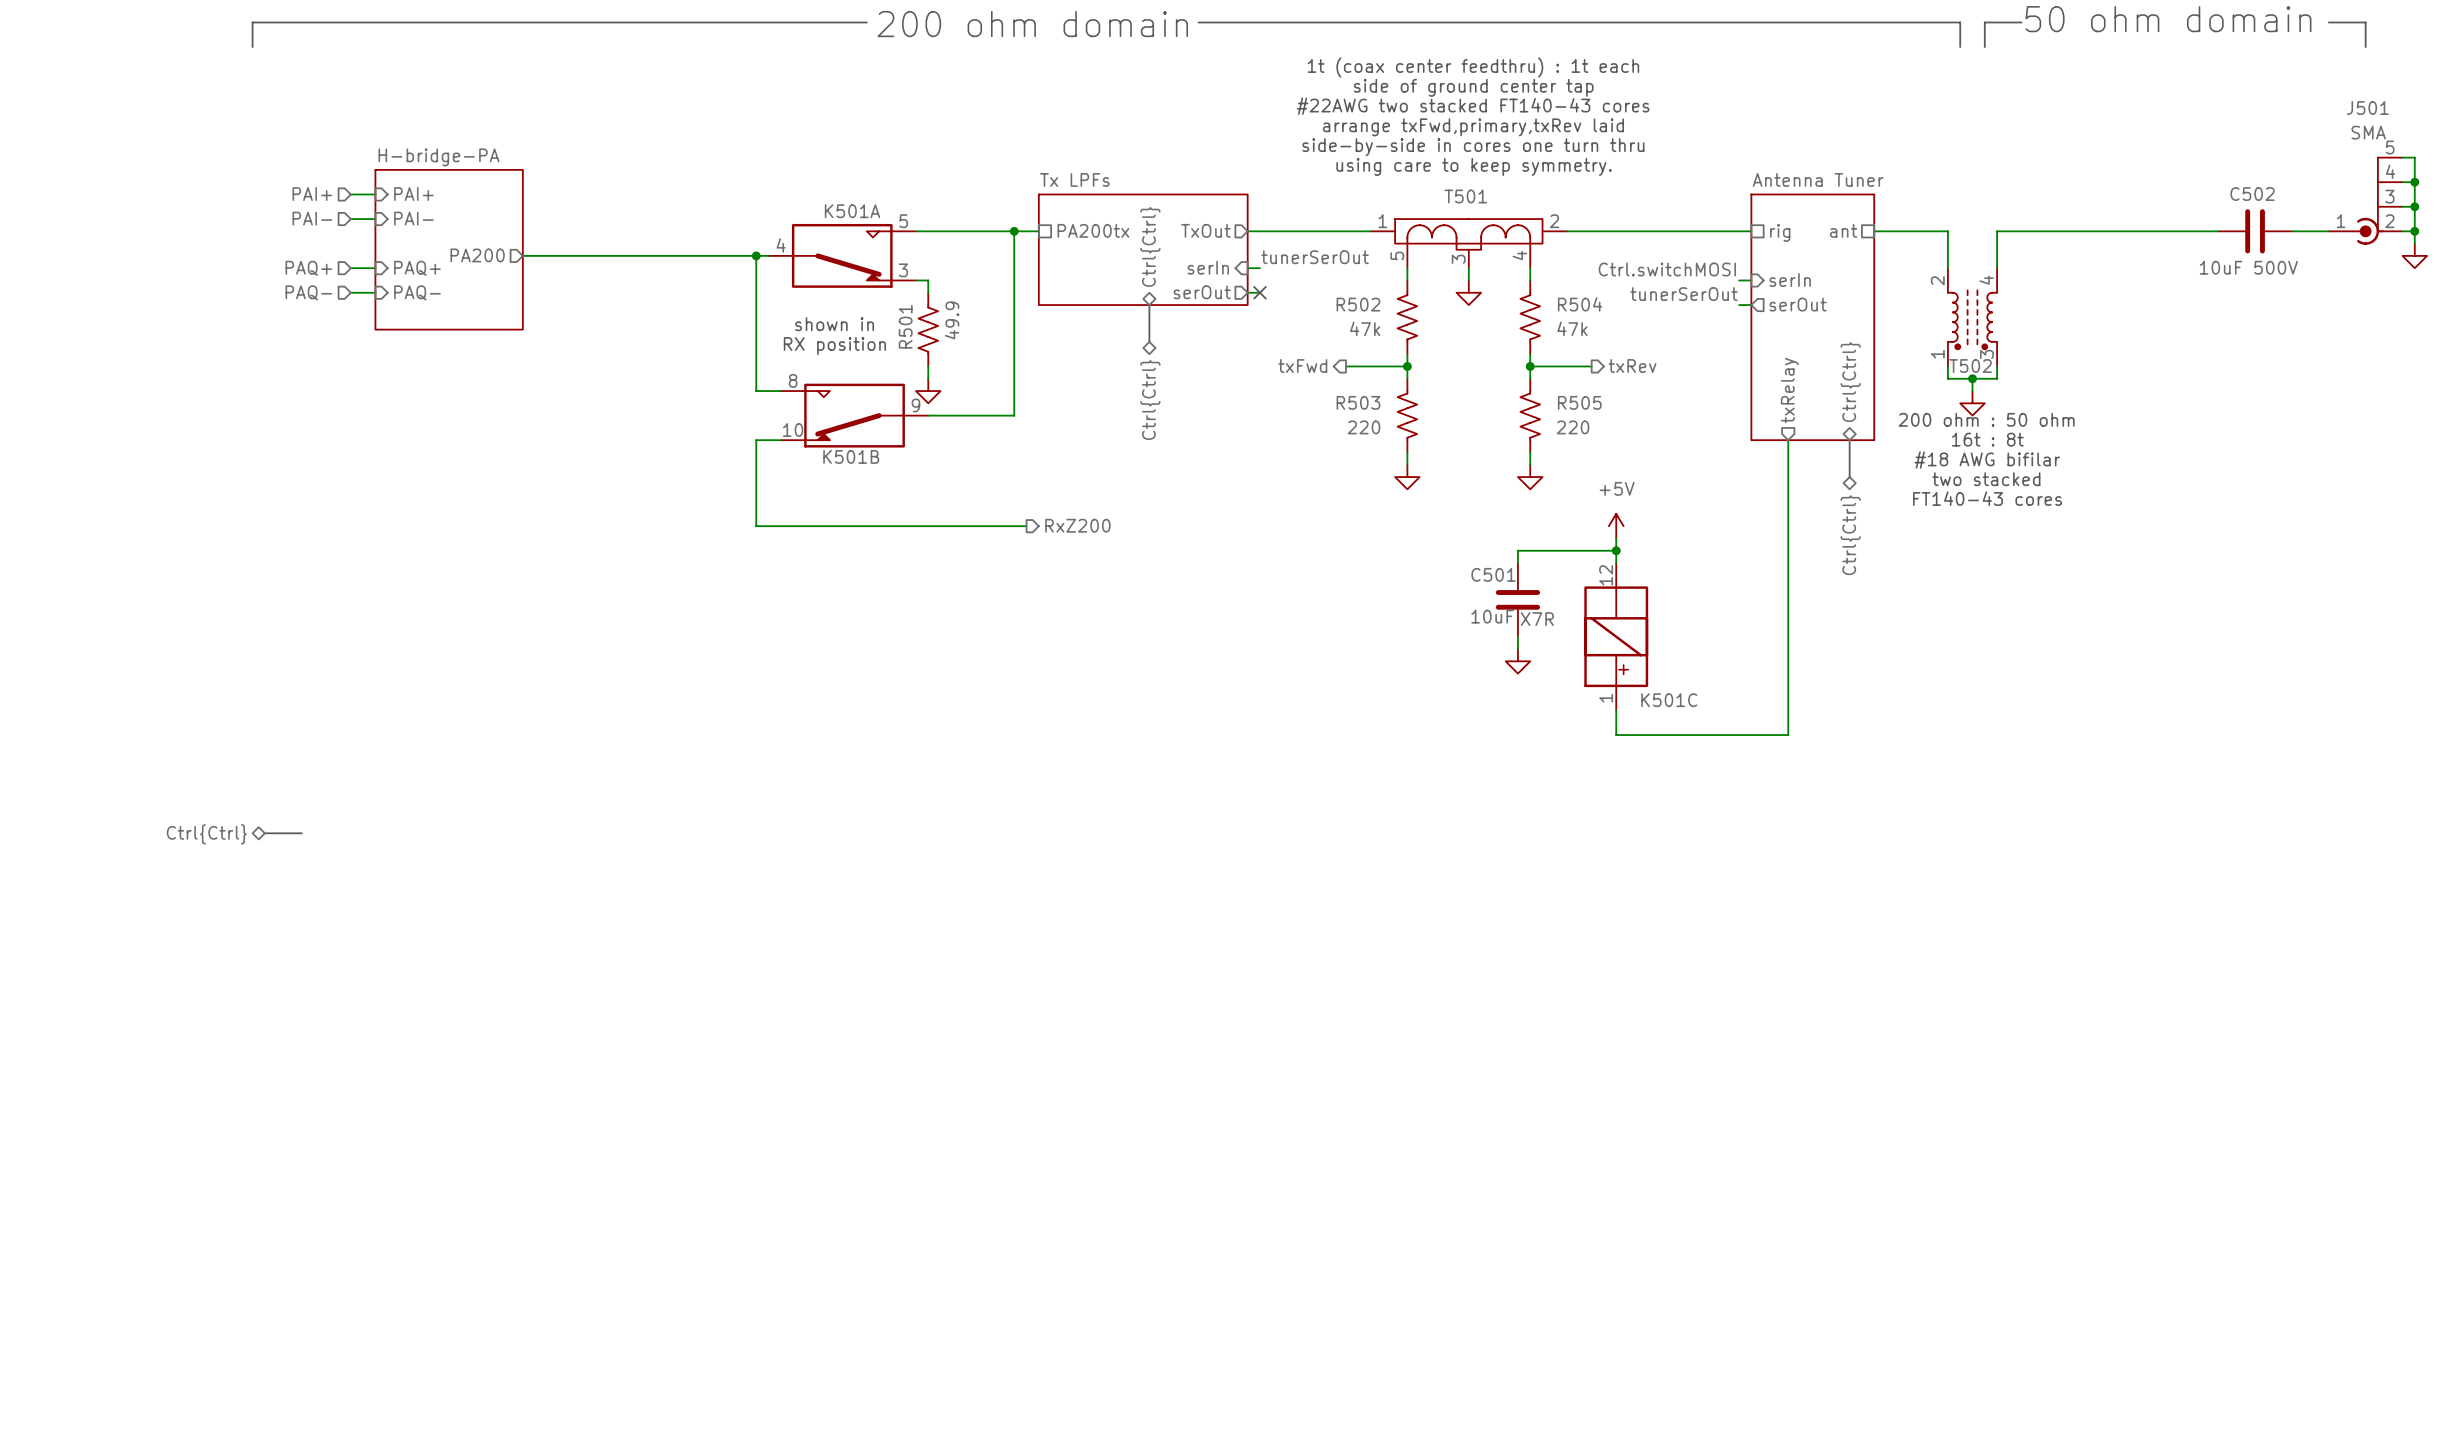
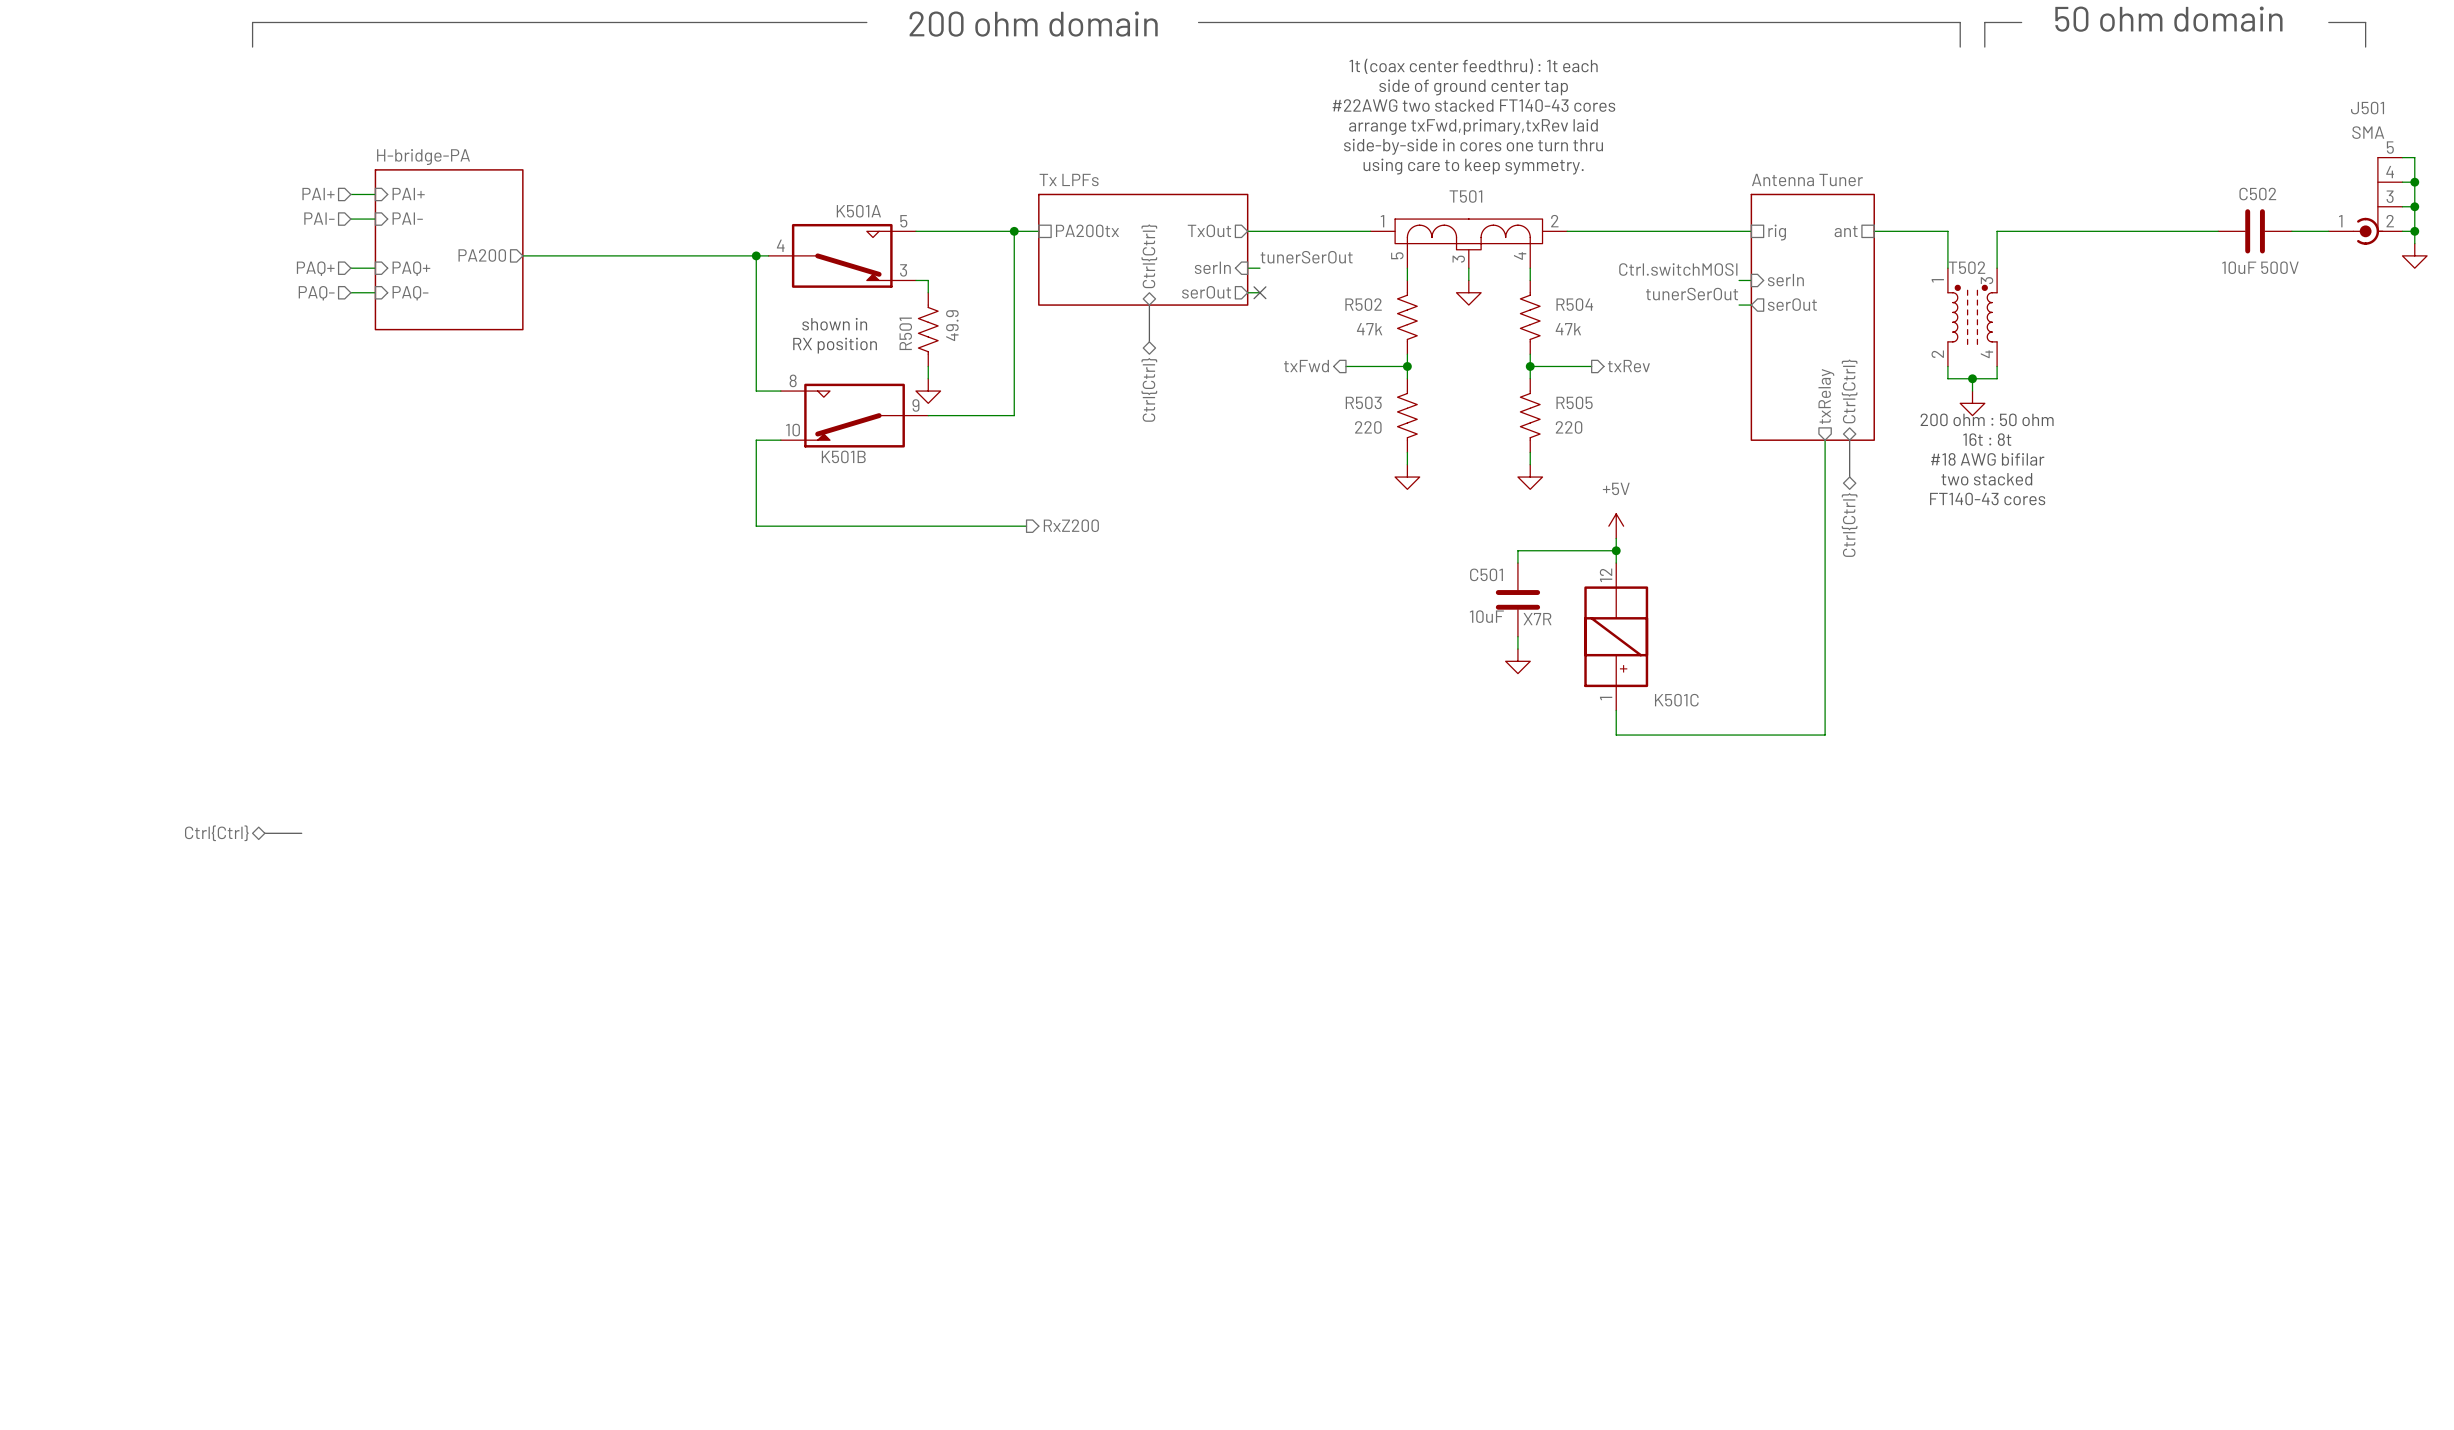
T502 flip: as is (1972, 319) -> up-down (1972, 314)
sheet pin position: txRelay (1789, 390) -> txRelay (1826, 396)
wire: (1788, 440) (1788, 735) -> (1825, 440) (1825, 735) (1788, 735)

